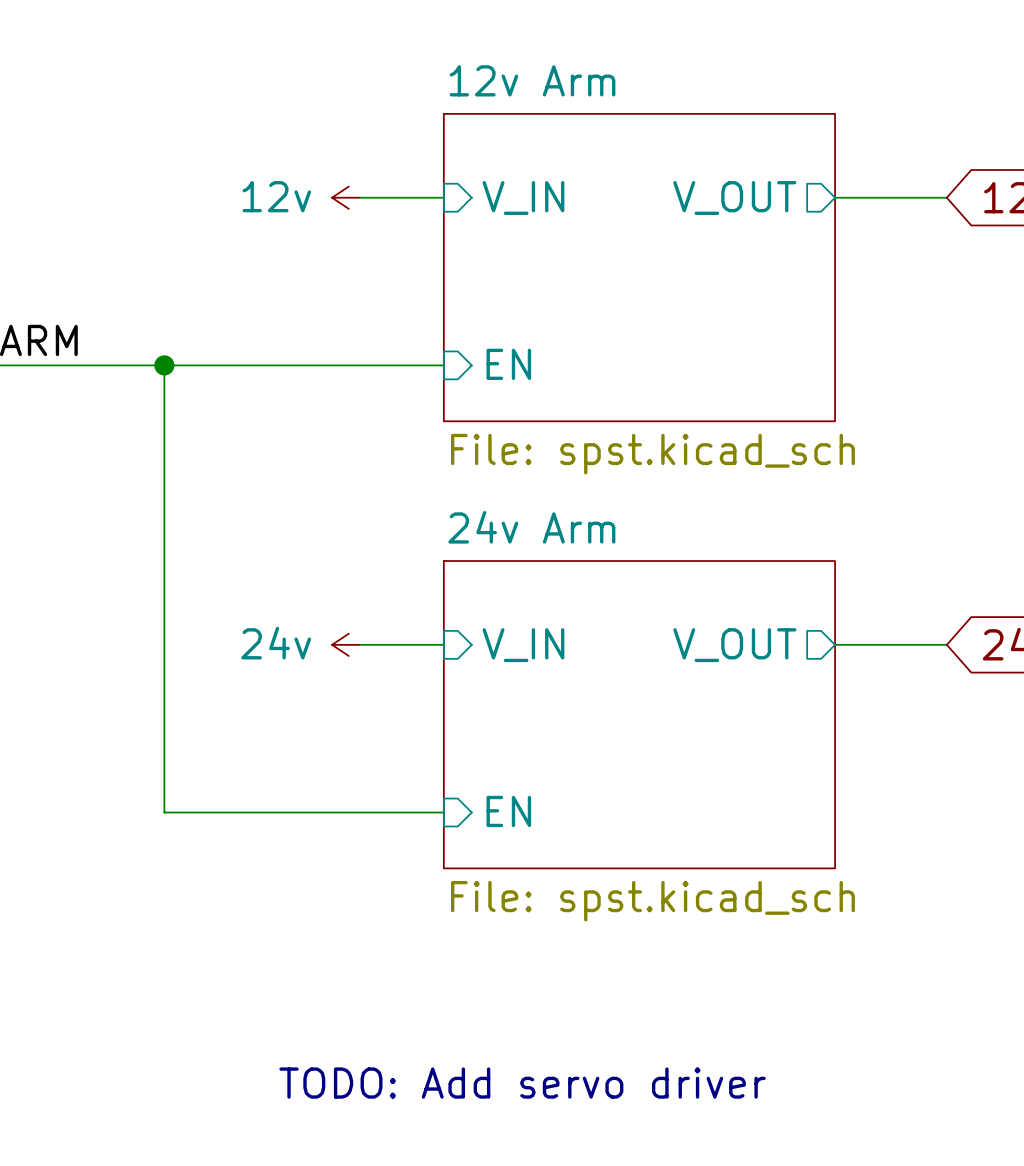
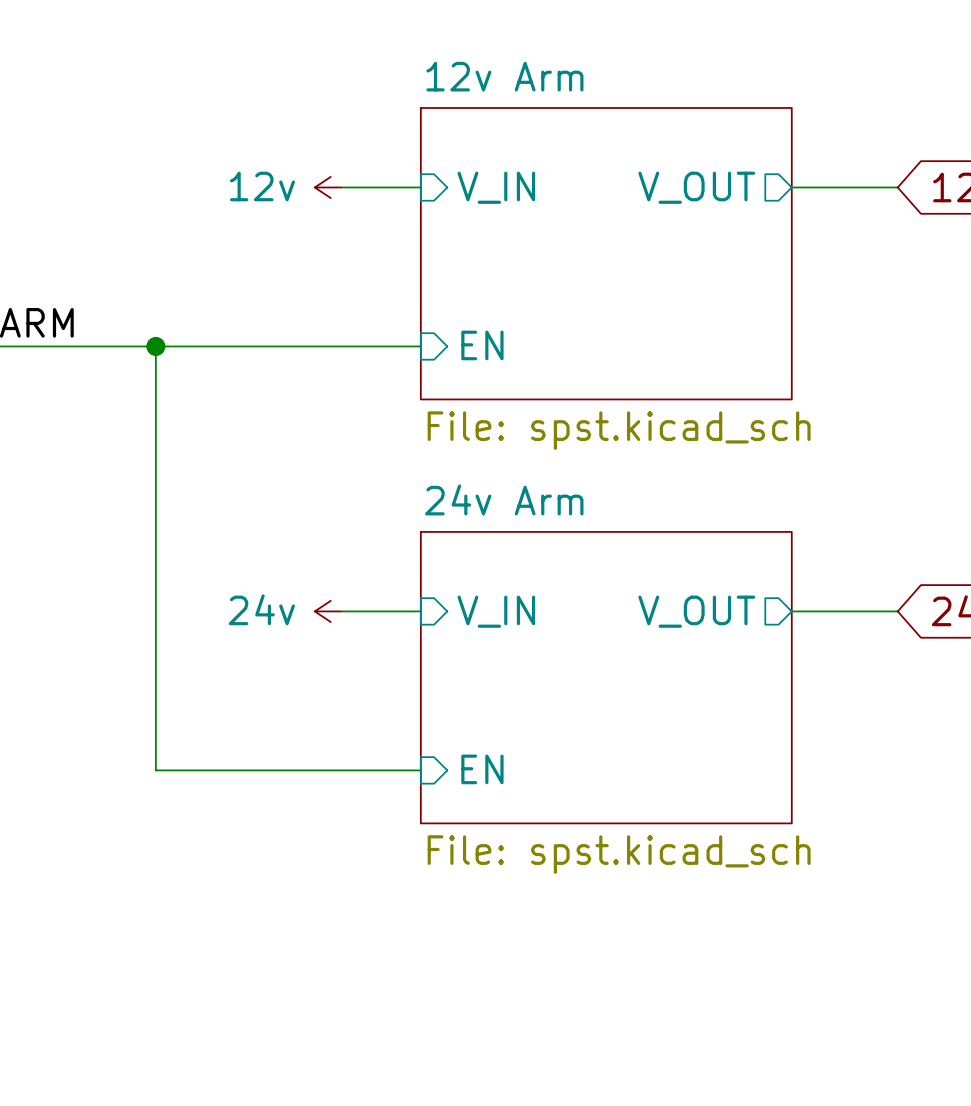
text: TODO: Add servo driver (522, 1083) -> none

